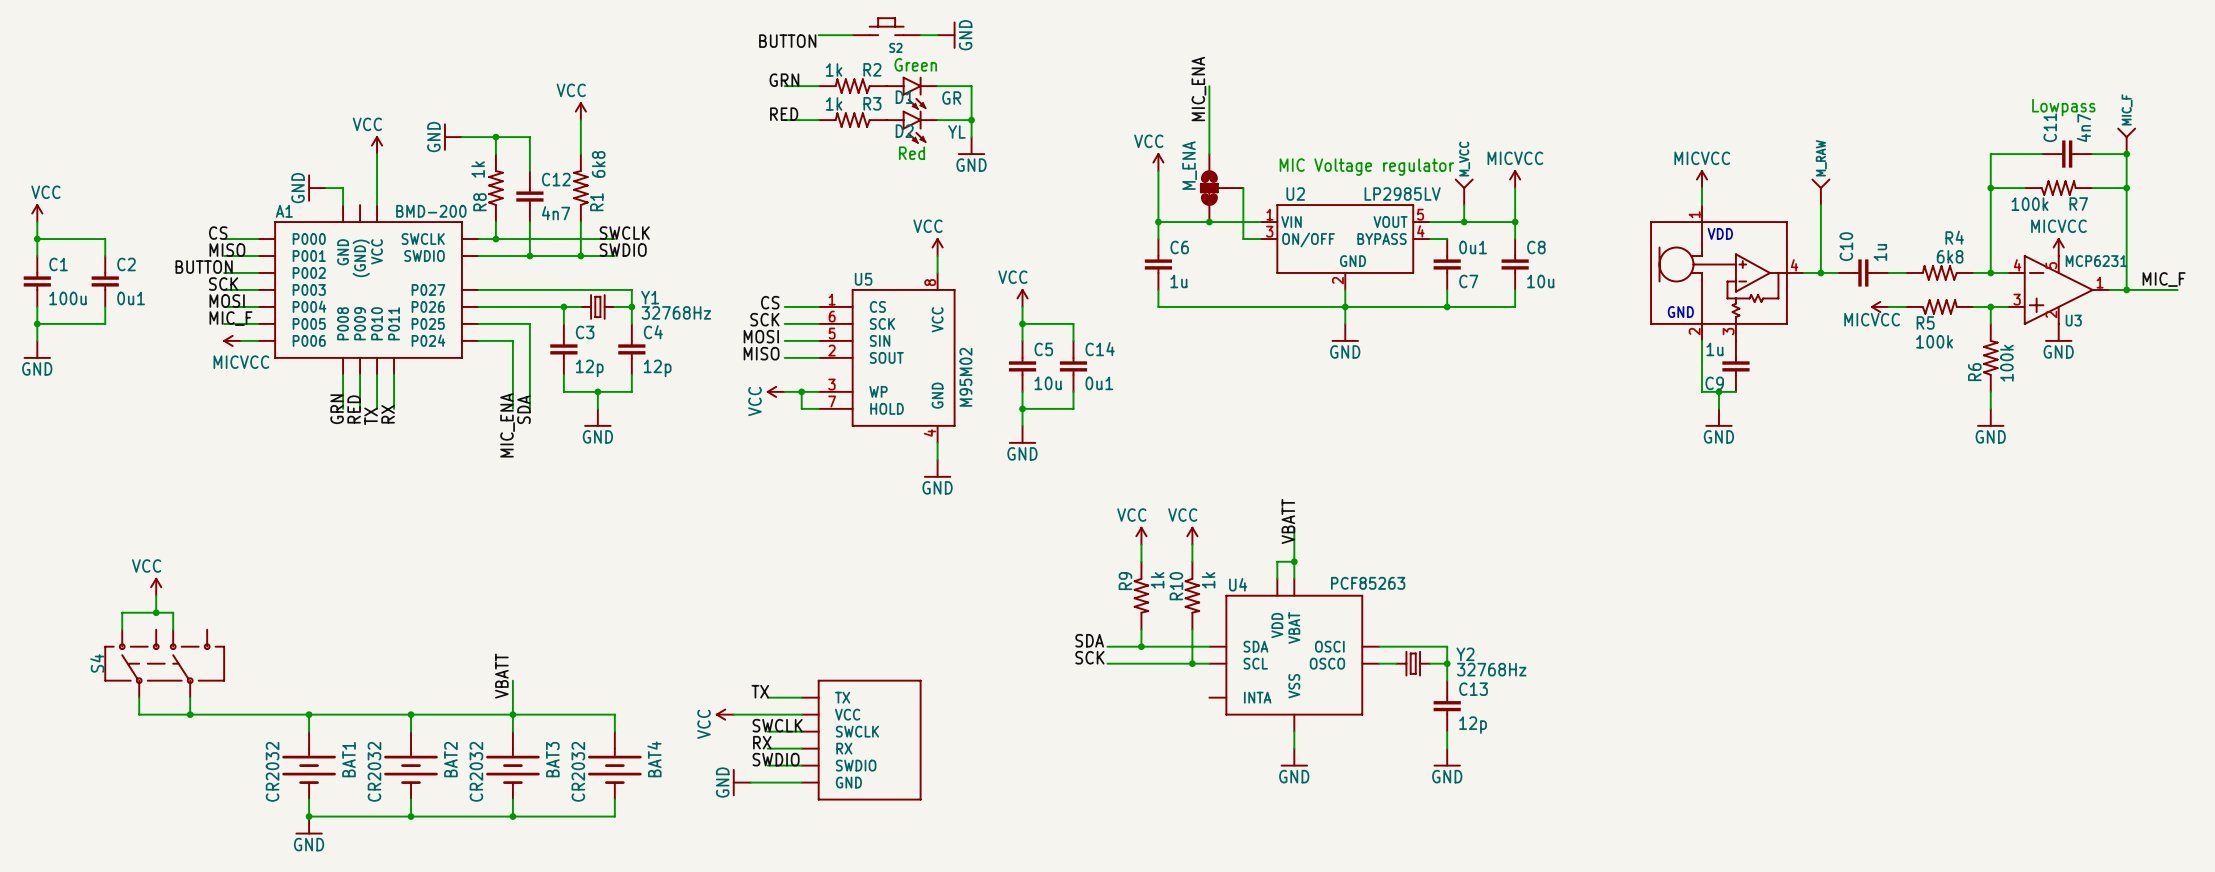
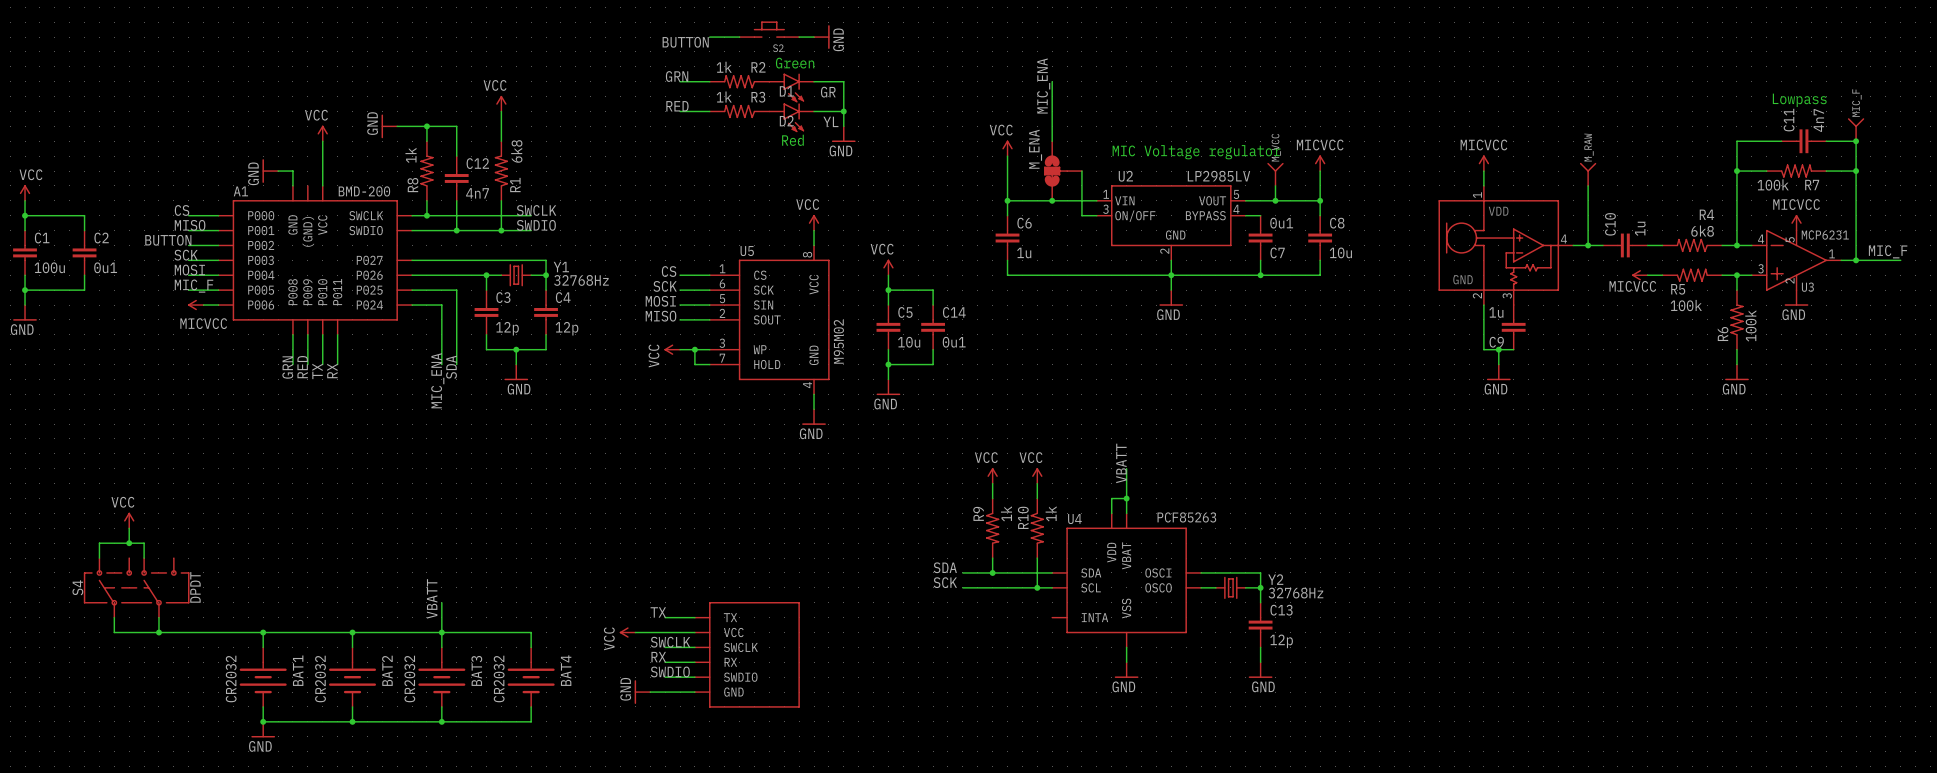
S4 value: none -> DPDT (195, 587)

